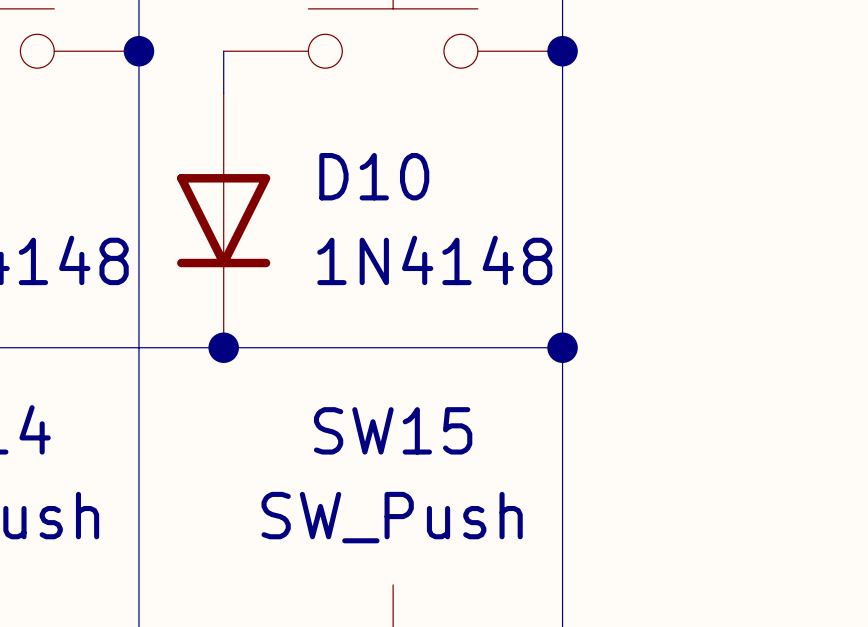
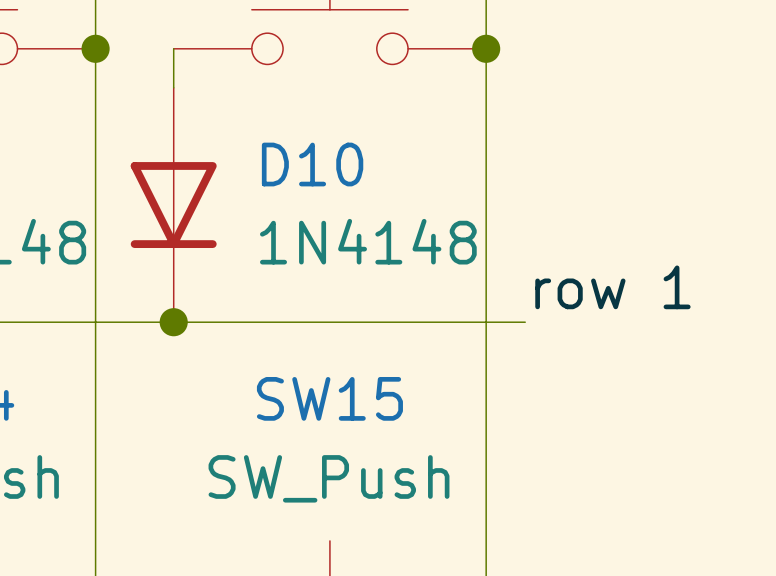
label: none -> row 1 (612, 287)
wire: none -> (486, 322) (525, 322)
junction: (562, 347) -> none

